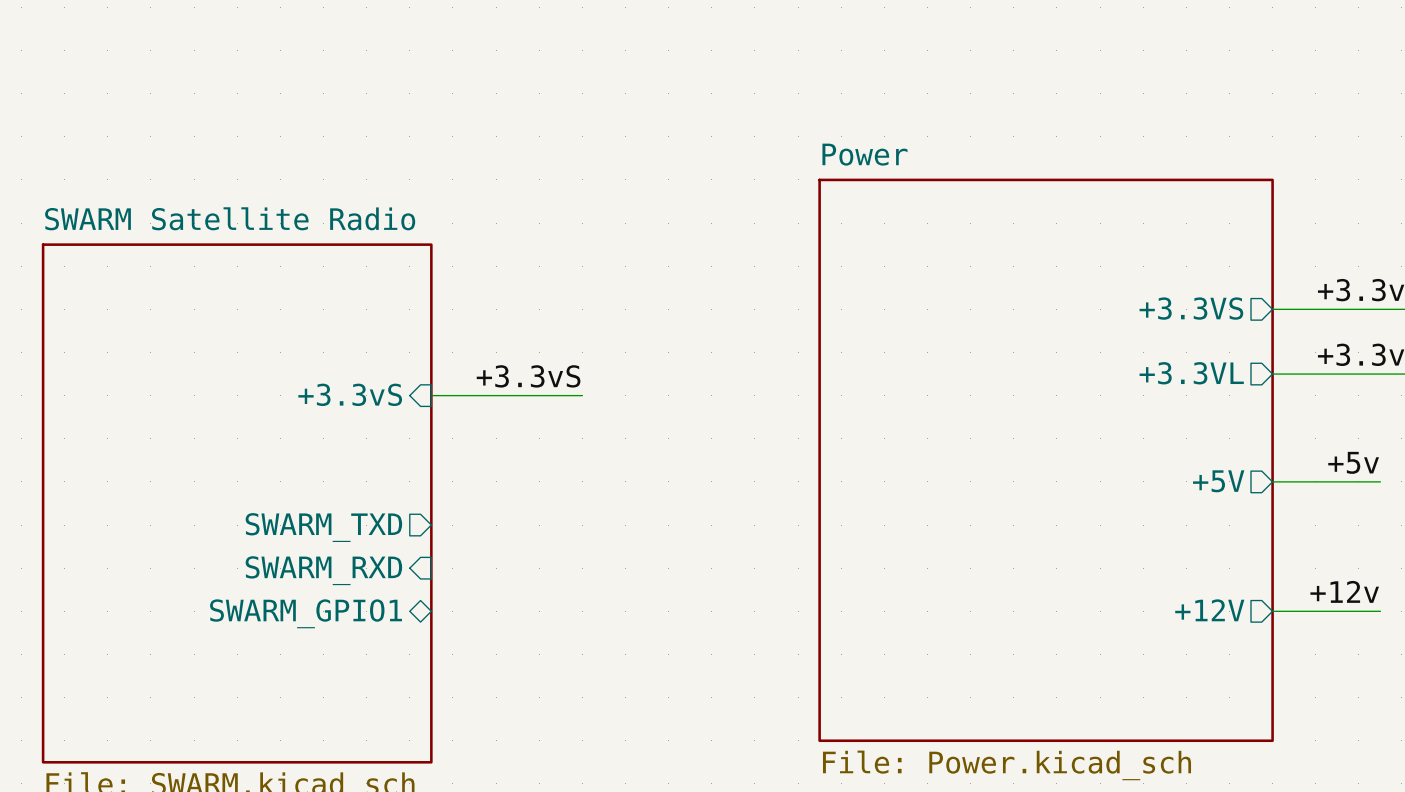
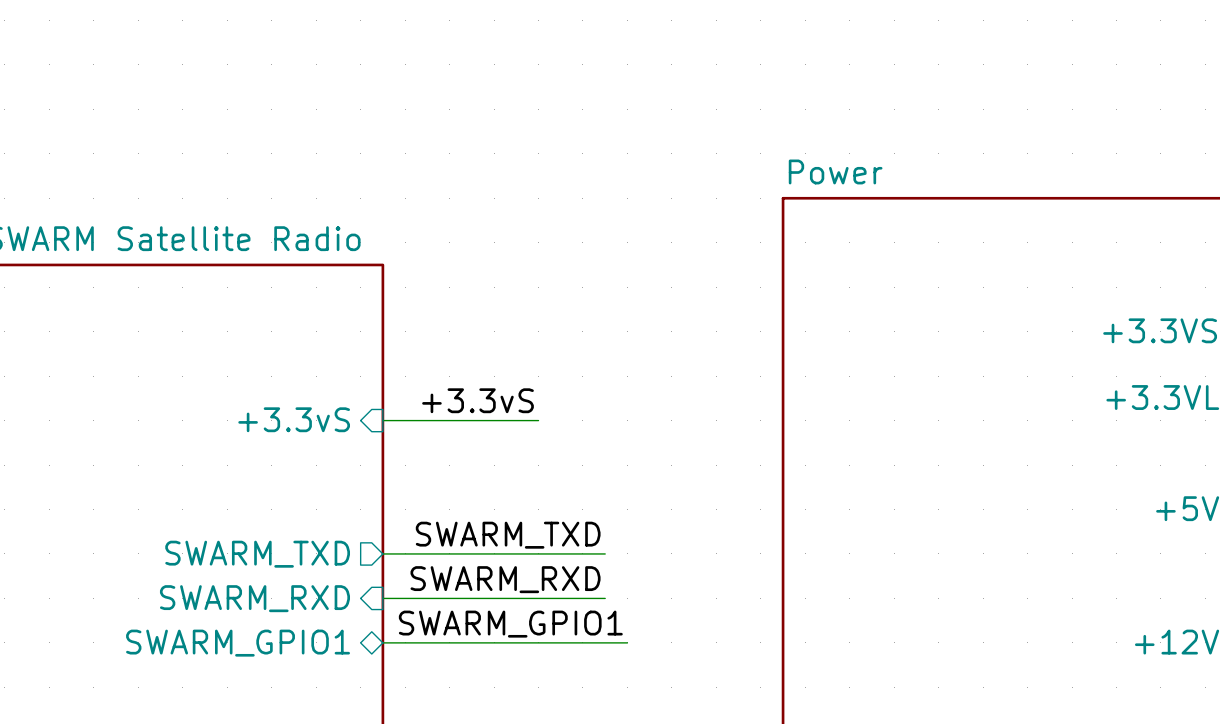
label: none -> SWARM_TXD (508, 535)
wire: none -> (382, 553) (605, 553)
label: none -> SWARM_RXD (505, 579)
wire: none -> (382, 598) (605, 598)
label: none -> SWARM_GPIO1 (510, 624)
wire: none -> (382, 642) (627, 642)

